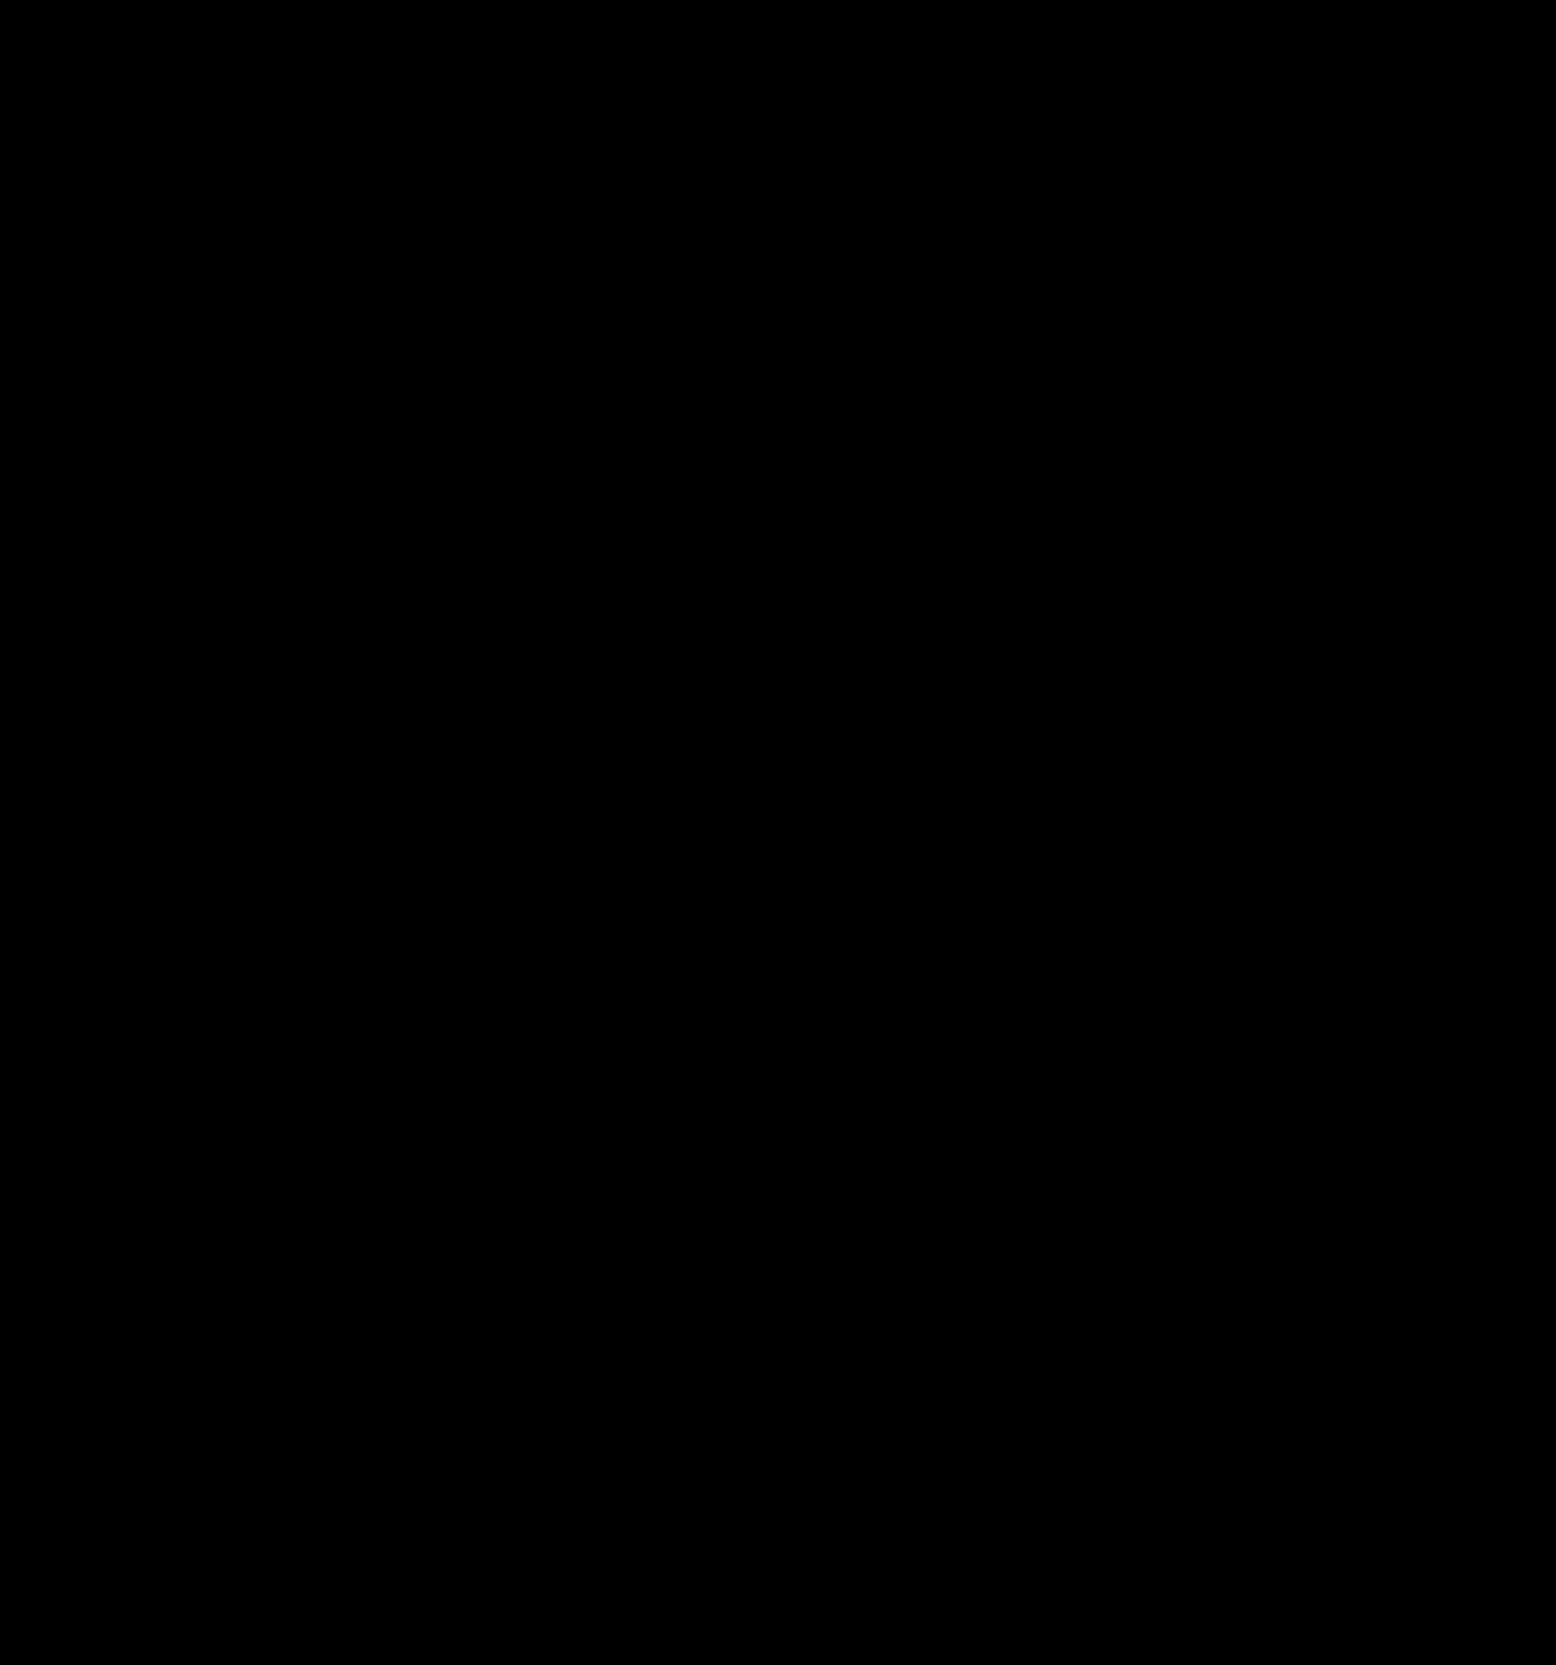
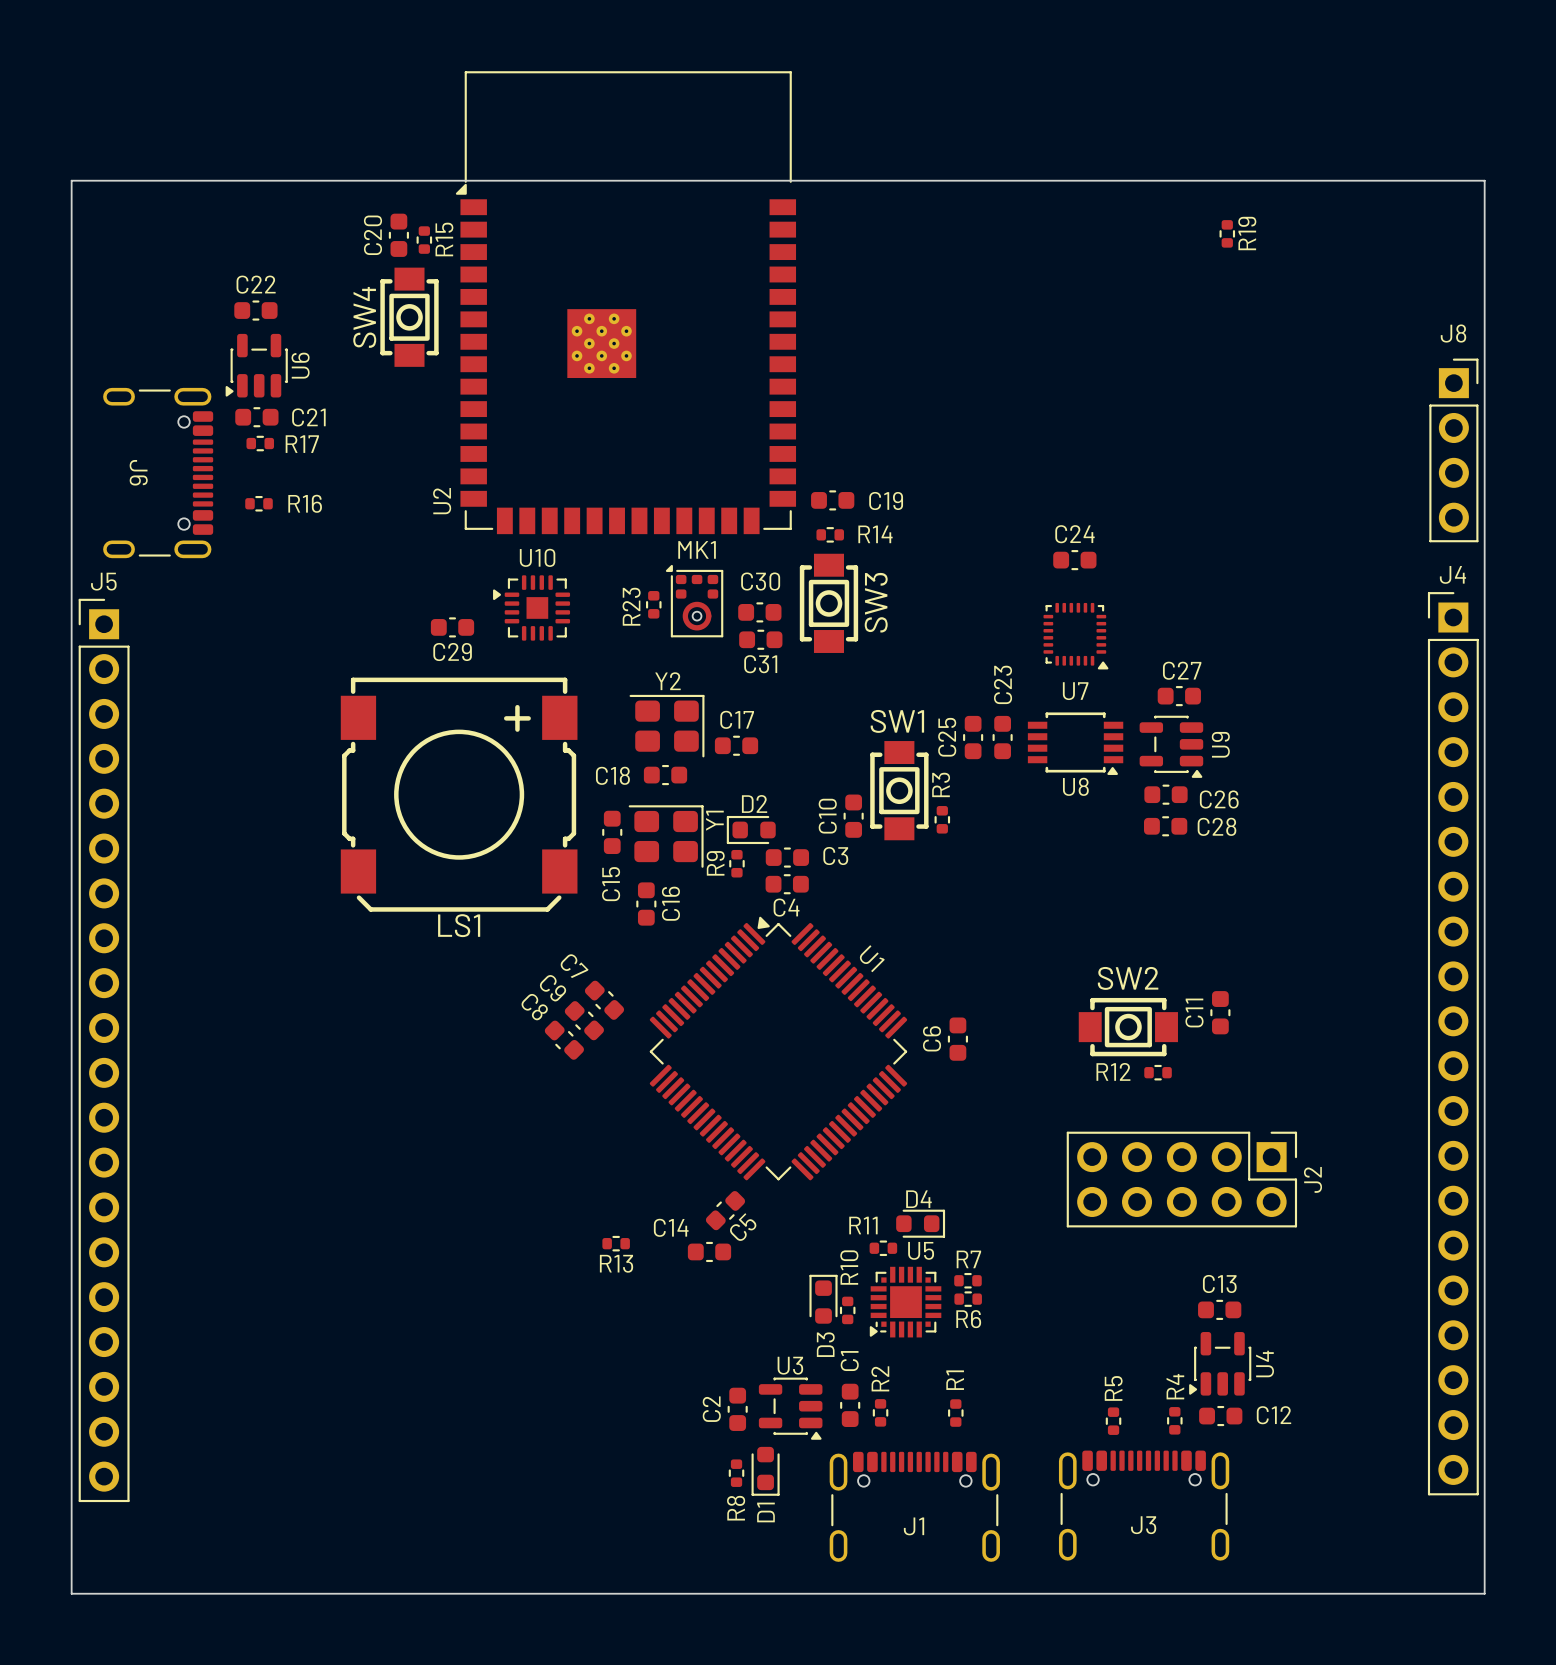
board edge: none -> (71, 180) (1484, 180) (1484, 1593) (71, 1593) (71, 180)
R19: none -> (1227, 233)
C20: none -> (398, 235)
R15: none -> (424, 240)
U2: none -> (625, 302)
C22: none -> (255, 310)
SW4: none -> (409, 317)
U6: none -> (256, 365)
C21: none -> (256, 417)
R17: none -> (260, 443)
J8: none -> (1453, 450)
J6: none -> (158, 473)
C19: none -> (832, 500)
R16: none -> (259, 503)
R14: none -> (830, 534)
C24: none -> (1074, 560)
MK1: none -> (694, 601)
SW3: none -> (828, 603)
R23: none -> (653, 604)
U10: none -> (531, 607)
C30: none -> (759, 612)
C29: none -> (452, 627)
U7: none -> (1075, 636)
C31: none -> (760, 639)
C27: none -> (1179, 696)
Y2: none -> (667, 726)
C25: none -> (973, 737)
C23: none -> (1002, 737)
U8: none -> (1075, 743)
C17: none -> (736, 745)
U9: none -> (1171, 746)
C18: none -> (665, 775)
SW1: none -> (899, 790)
LS1: none -> (459, 794)
C26: none -> (1165, 794)
C10: none -> (853, 816)
R3: none -> (942, 819)
C28: none -> (1165, 826)
D2: none -> (751, 829)
C15: none -> (612, 832)
Y1: none -> (666, 836)
C3: none -> (787, 857)
R9: none -> (736, 863)
C4: none -> (787, 884)
C16: none -> (646, 904)
C7: none -> (604, 1000)
C11: none -> (1220, 1012)
C9: none -> (584, 1020)
SW2: none -> (1128, 1027)
C6: none -> (957, 1039)
C8: none -> (564, 1040)
J4: none -> (1453, 1043)
U1: none -> (778, 1048)
J5: none -> (104, 1050)
R12: none -> (1158, 1072)
J2: none -> (1181, 1179)
C5: none -> (725, 1210)
D4: none -> (920, 1223)
R13: none -> (616, 1243)
R11: none -> (883, 1248)
C14: none -> (709, 1251)
R7: none -> (967, 1280)
D3: none -> (823, 1299)
R6: none -> (968, 1299)
U5: none -> (905, 1302)
C13: none -> (1219, 1309)
R10: none -> (847, 1310)
U4: none -> (1220, 1363)
C1: none -> (850, 1405)
U3: none -> (790, 1408)
C2: none -> (737, 1409)
R2: none -> (880, 1412)
R1: none -> (955, 1413)
C12: none -> (1220, 1416)
R4: none -> (1174, 1420)
R5: none -> (1113, 1421)
D1: none -> (765, 1471)
R8: none -> (736, 1473)
J3: none -> (1144, 1505)
J1: none -> (914, 1506)

